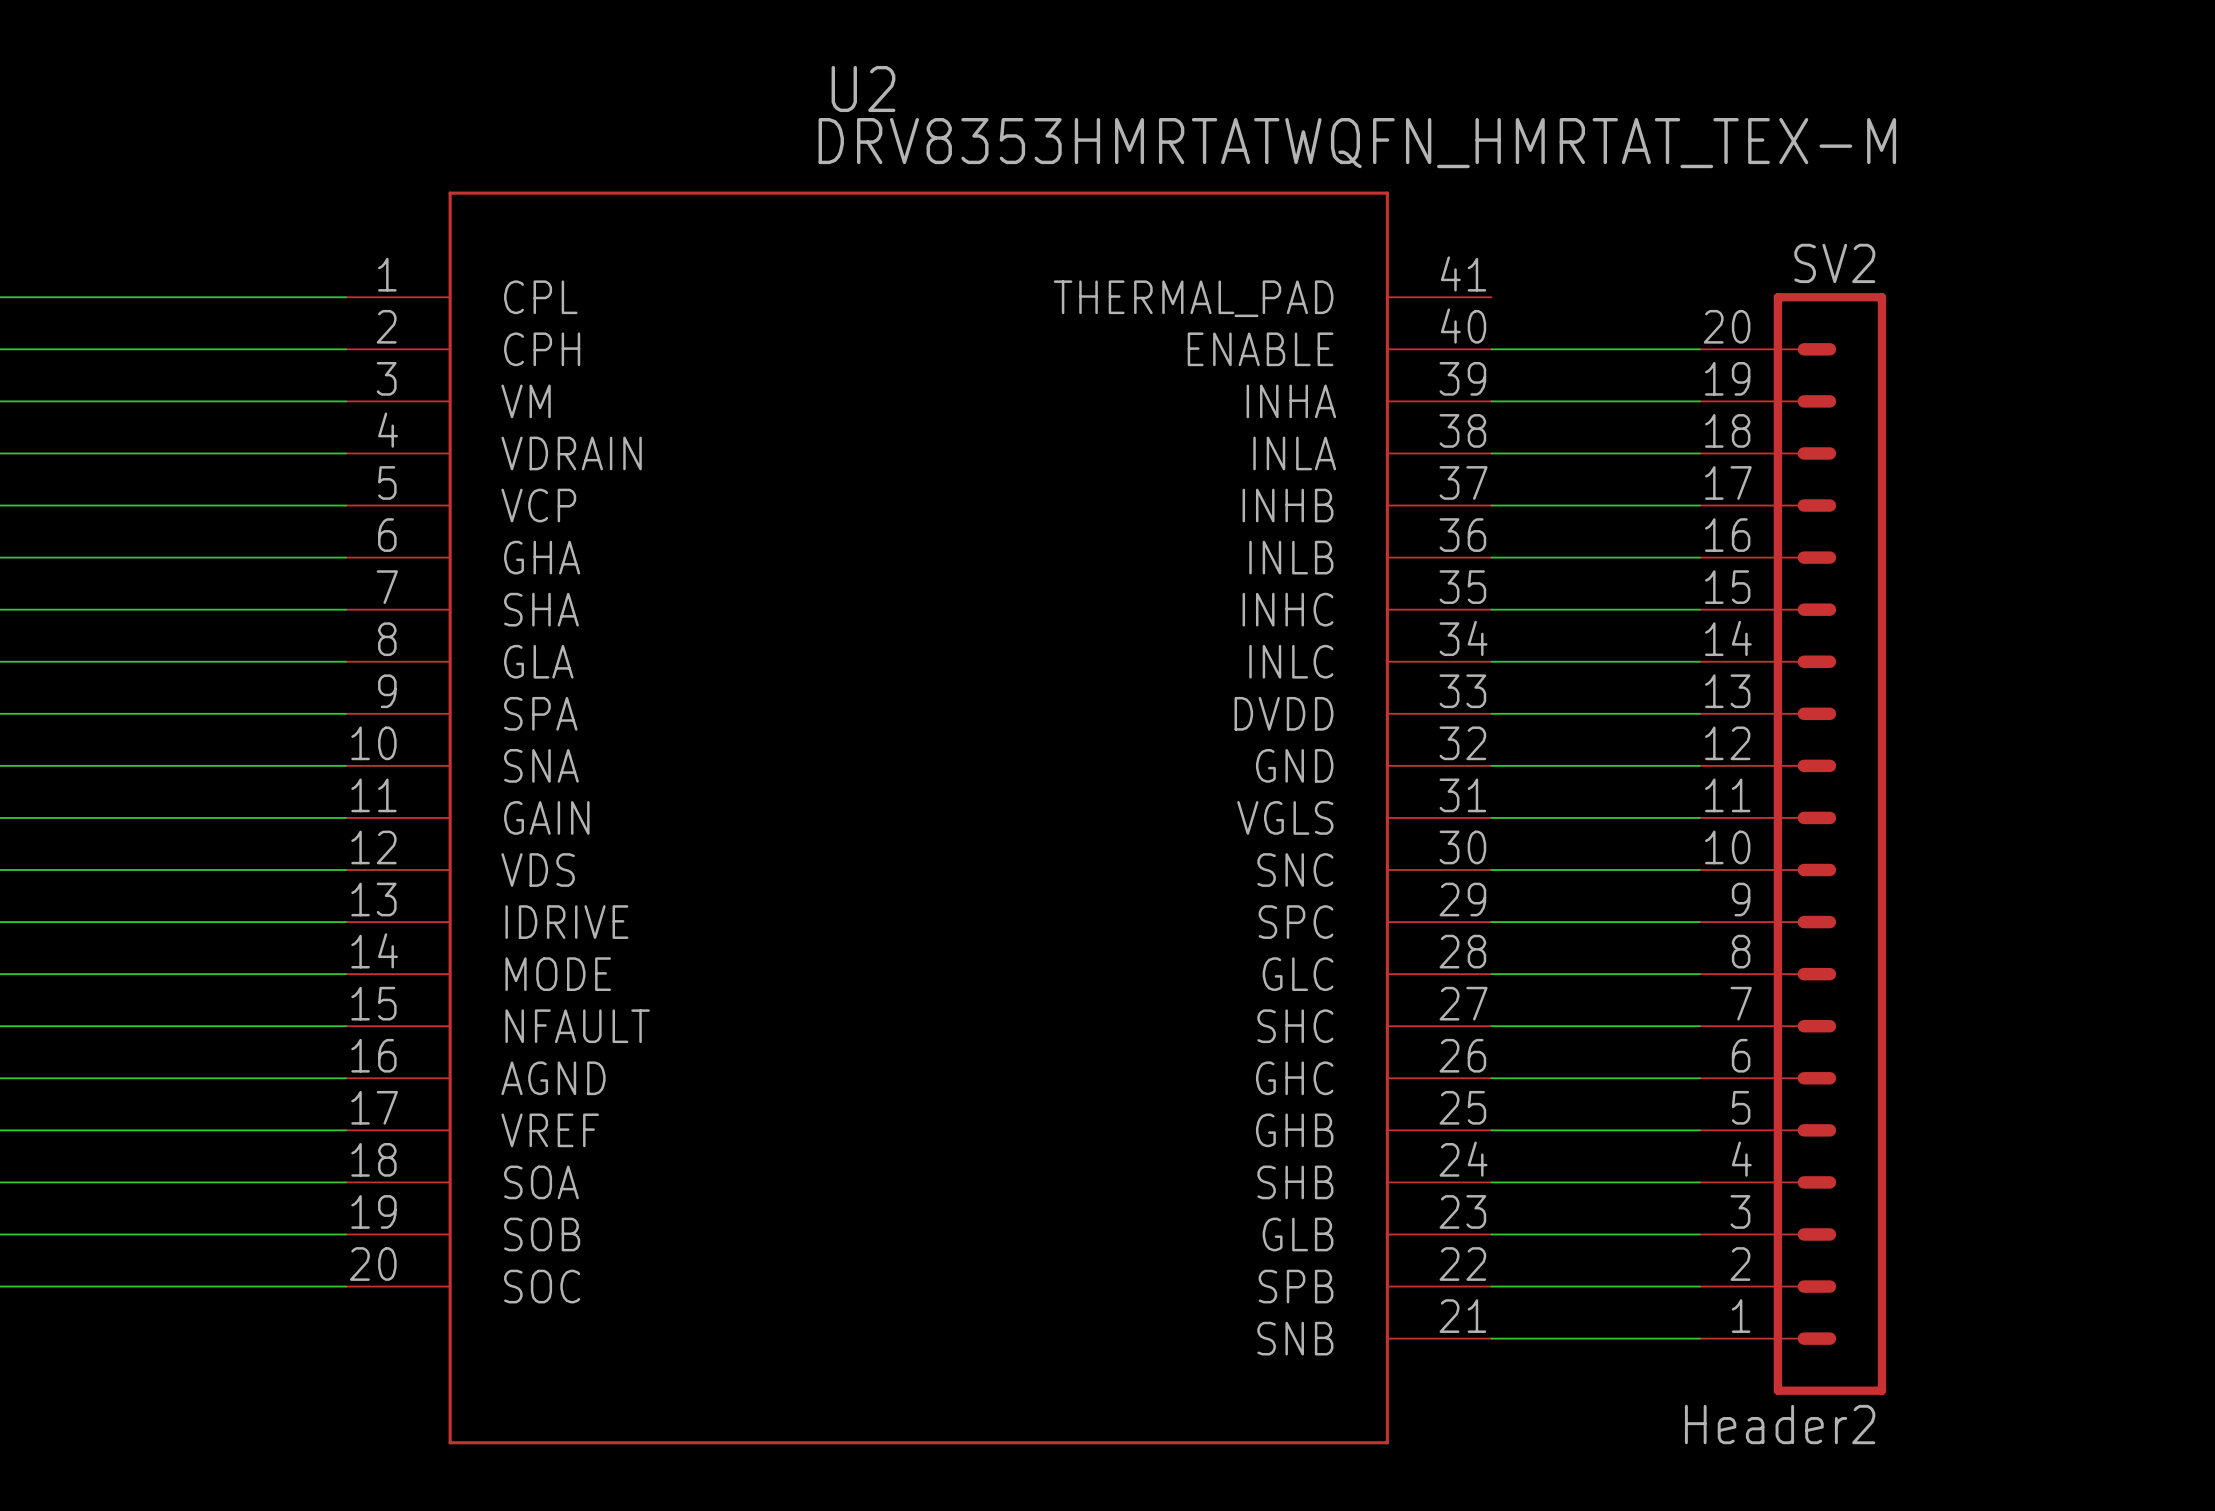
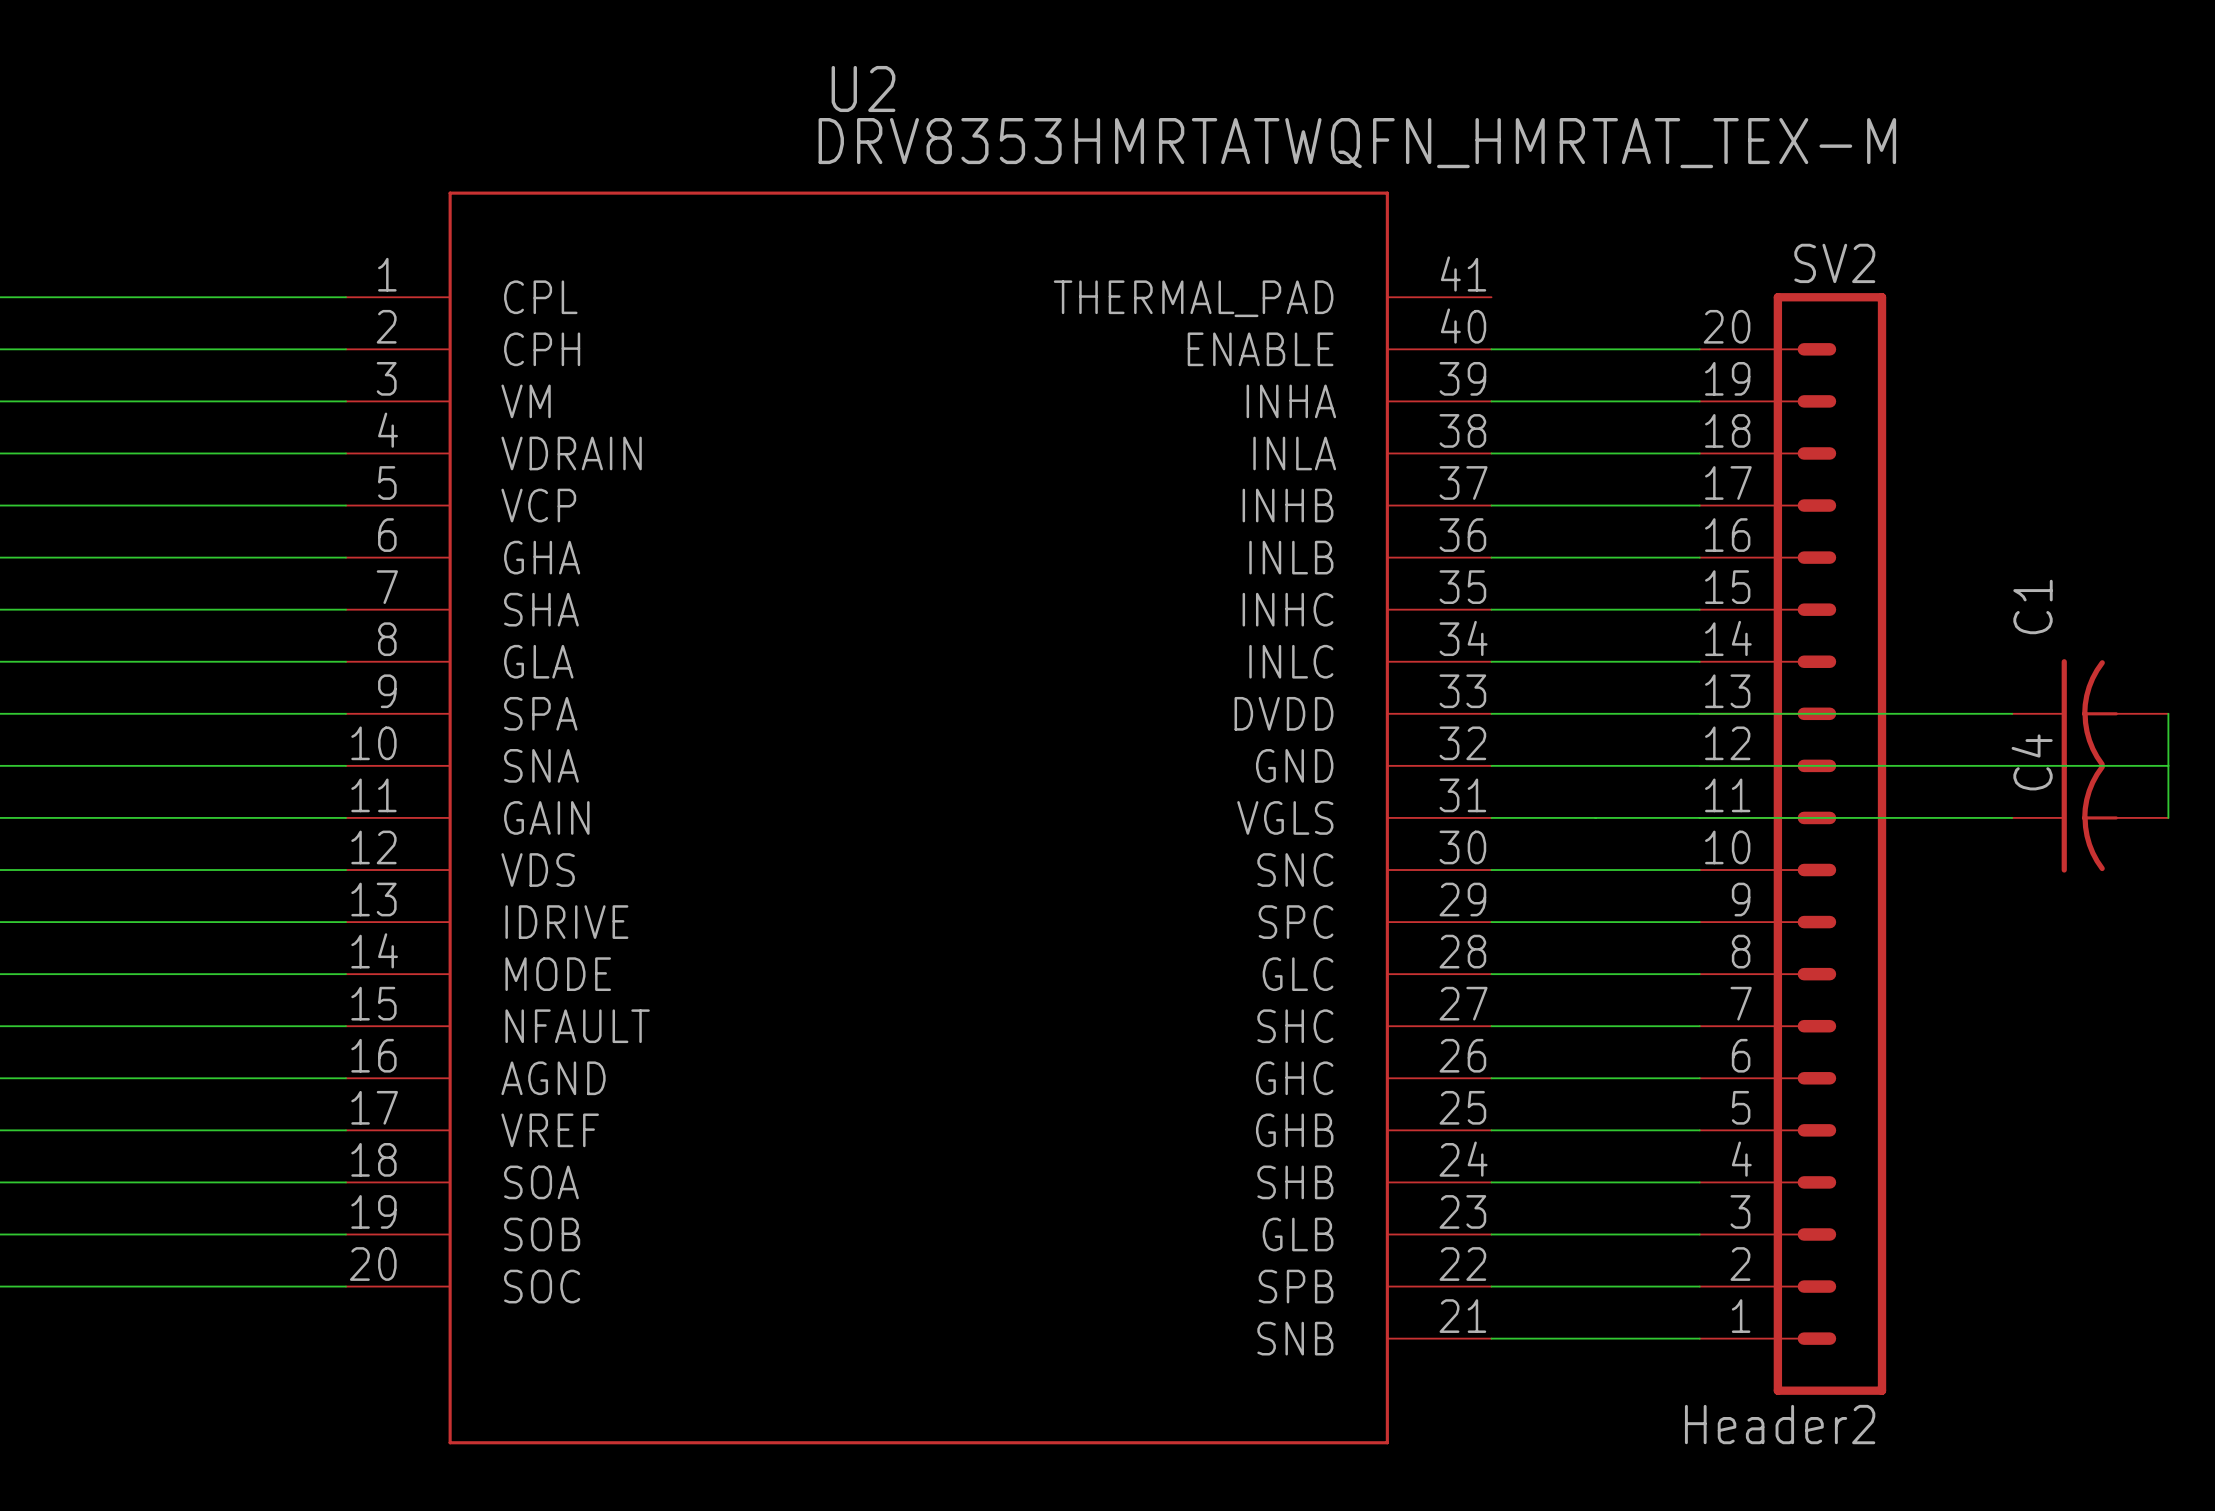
wire: none -> (1699, 713) (2012, 713)
C1: none -> (2090, 713)
wire: none -> (2168, 713) (2168, 817)
wire: none -> (1699, 765) (2168, 765)
wire: none -> (1699, 817) (2012, 817)
C4: none -> (2090, 817)

